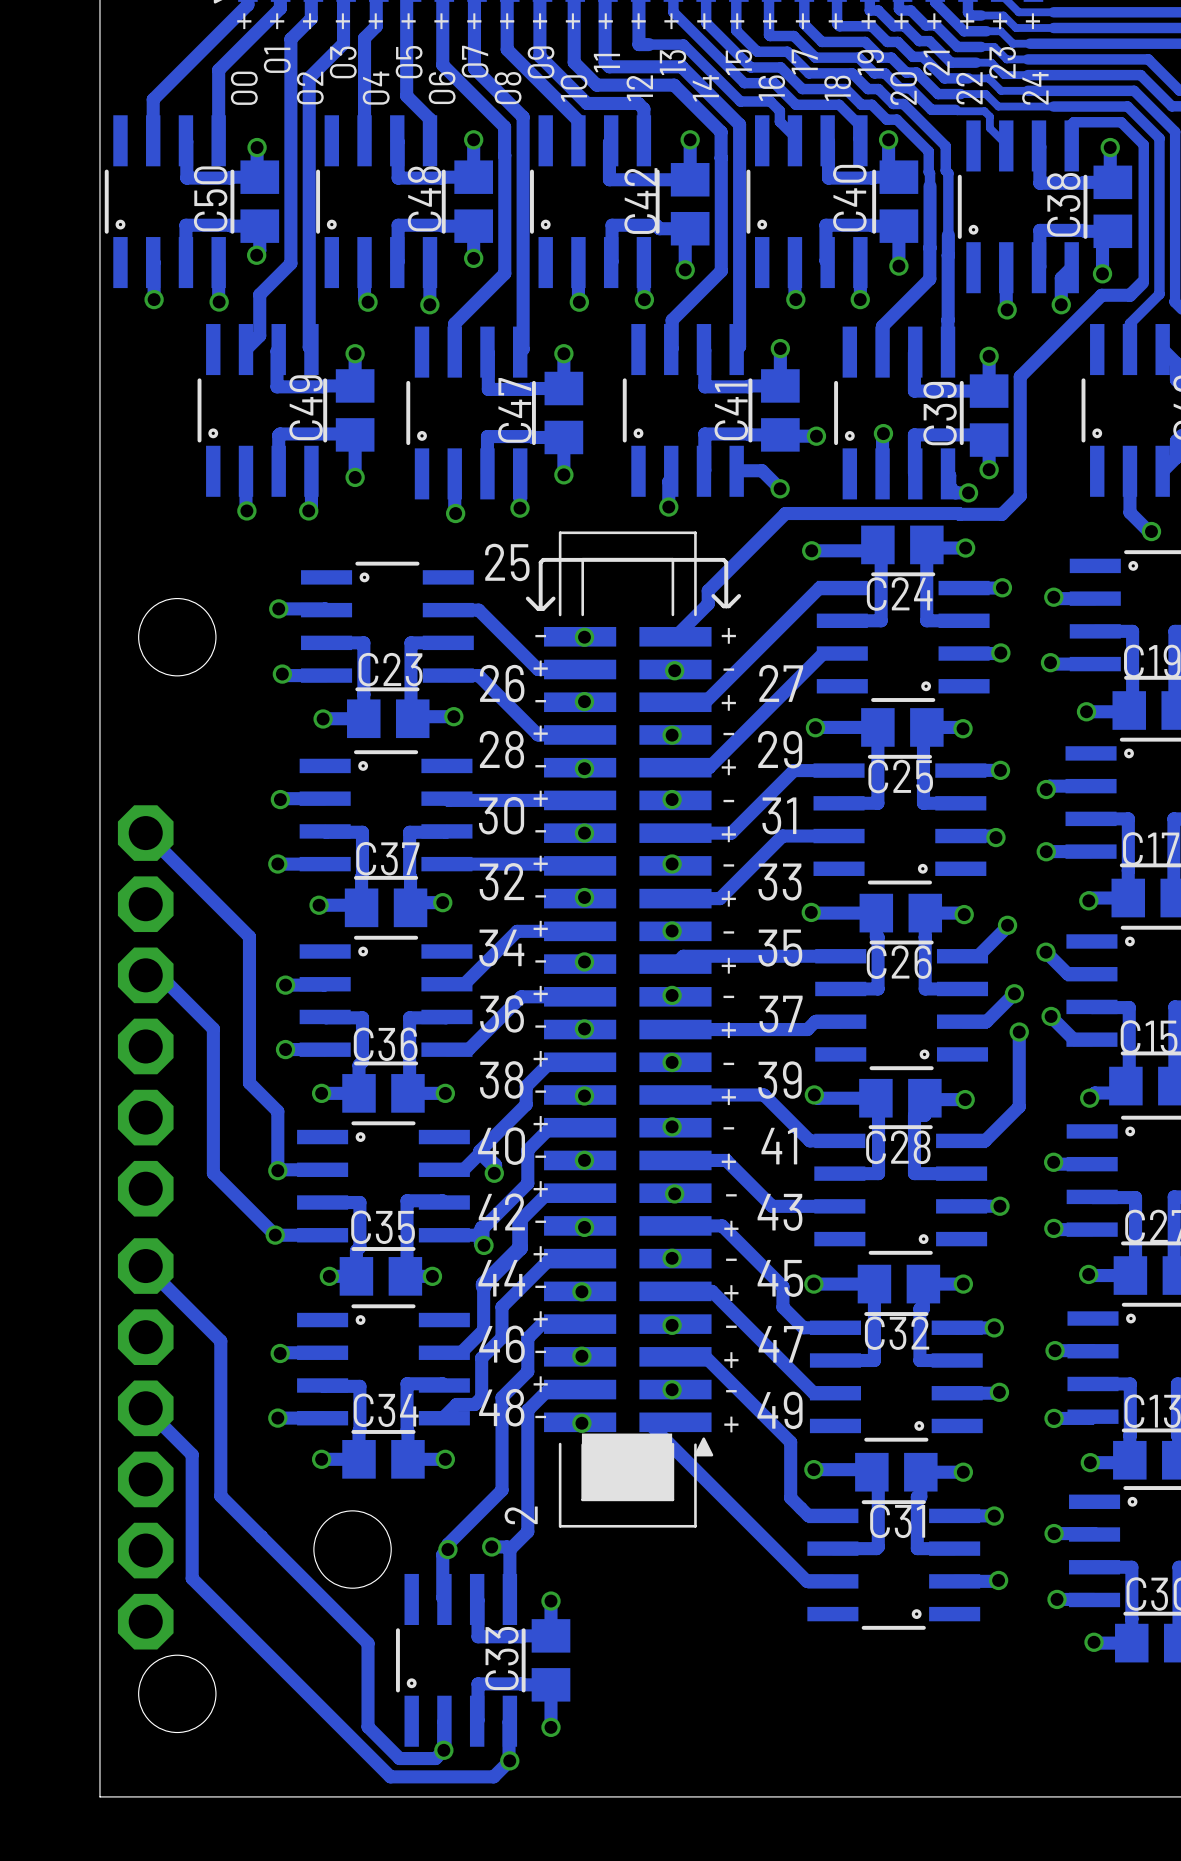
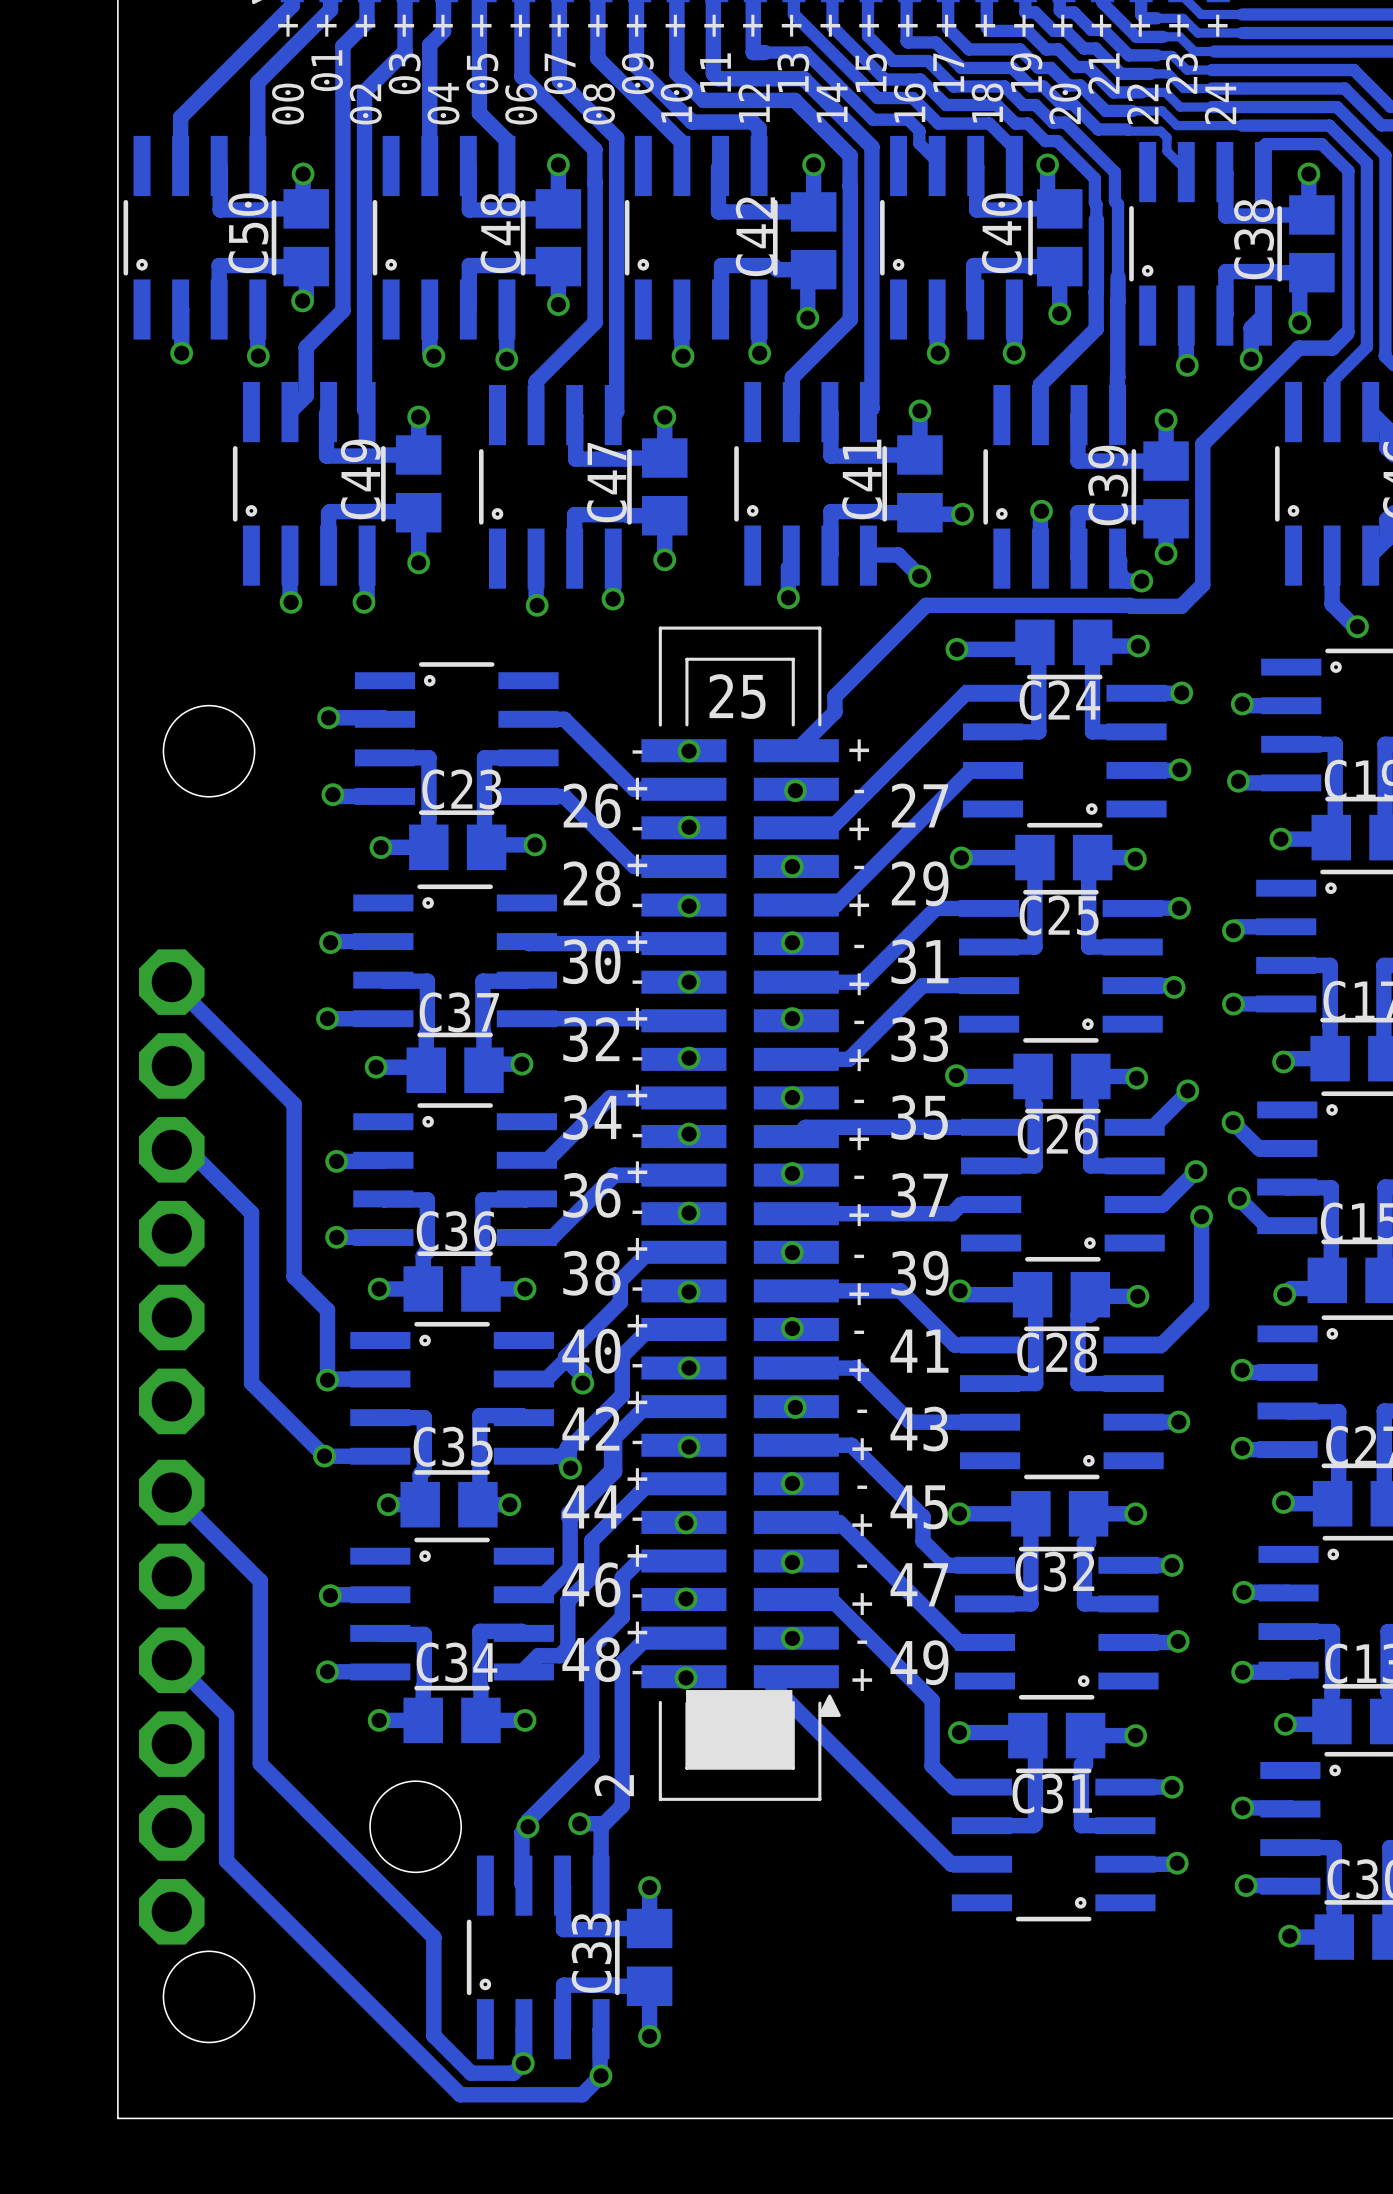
text position: 25 (507, 562) -> 25 (737, 696)
line: (739, 595) (728, 606) (723, 606) (713, 595) -> none
line: (553, 598) (543, 608) (538, 608) (527, 598) -> none
line: (726, 606) (726, 562) (723, 559) (543, 559) (540, 562) (540, 608) -> none

